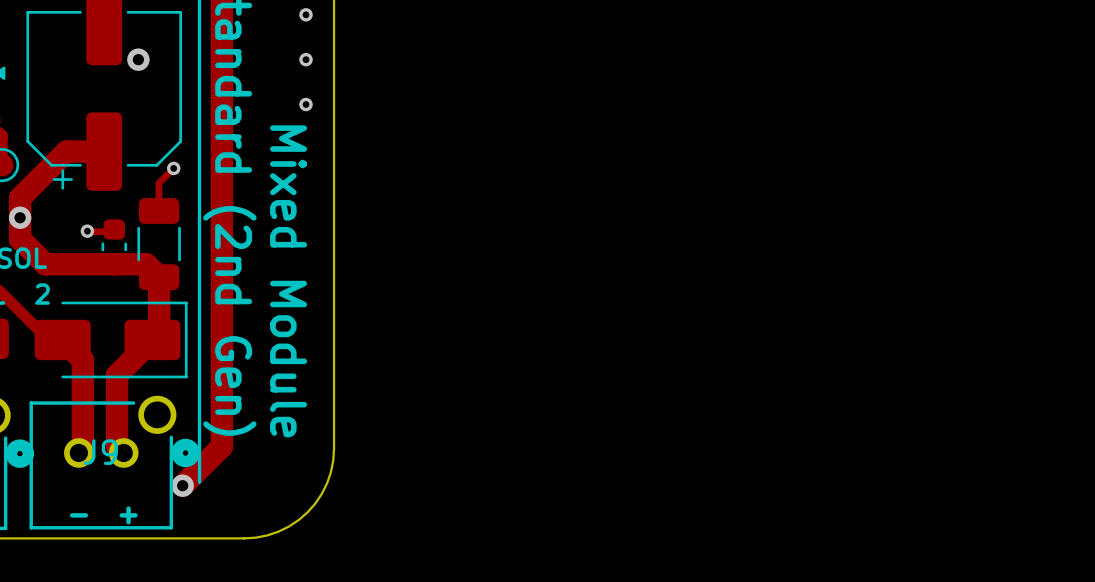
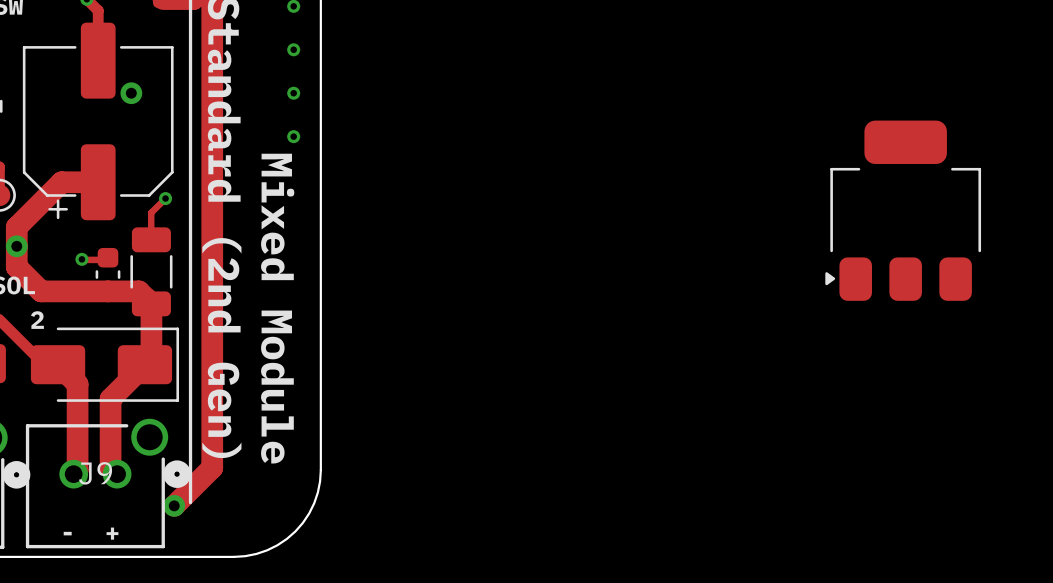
part: none -> (903, 210)

